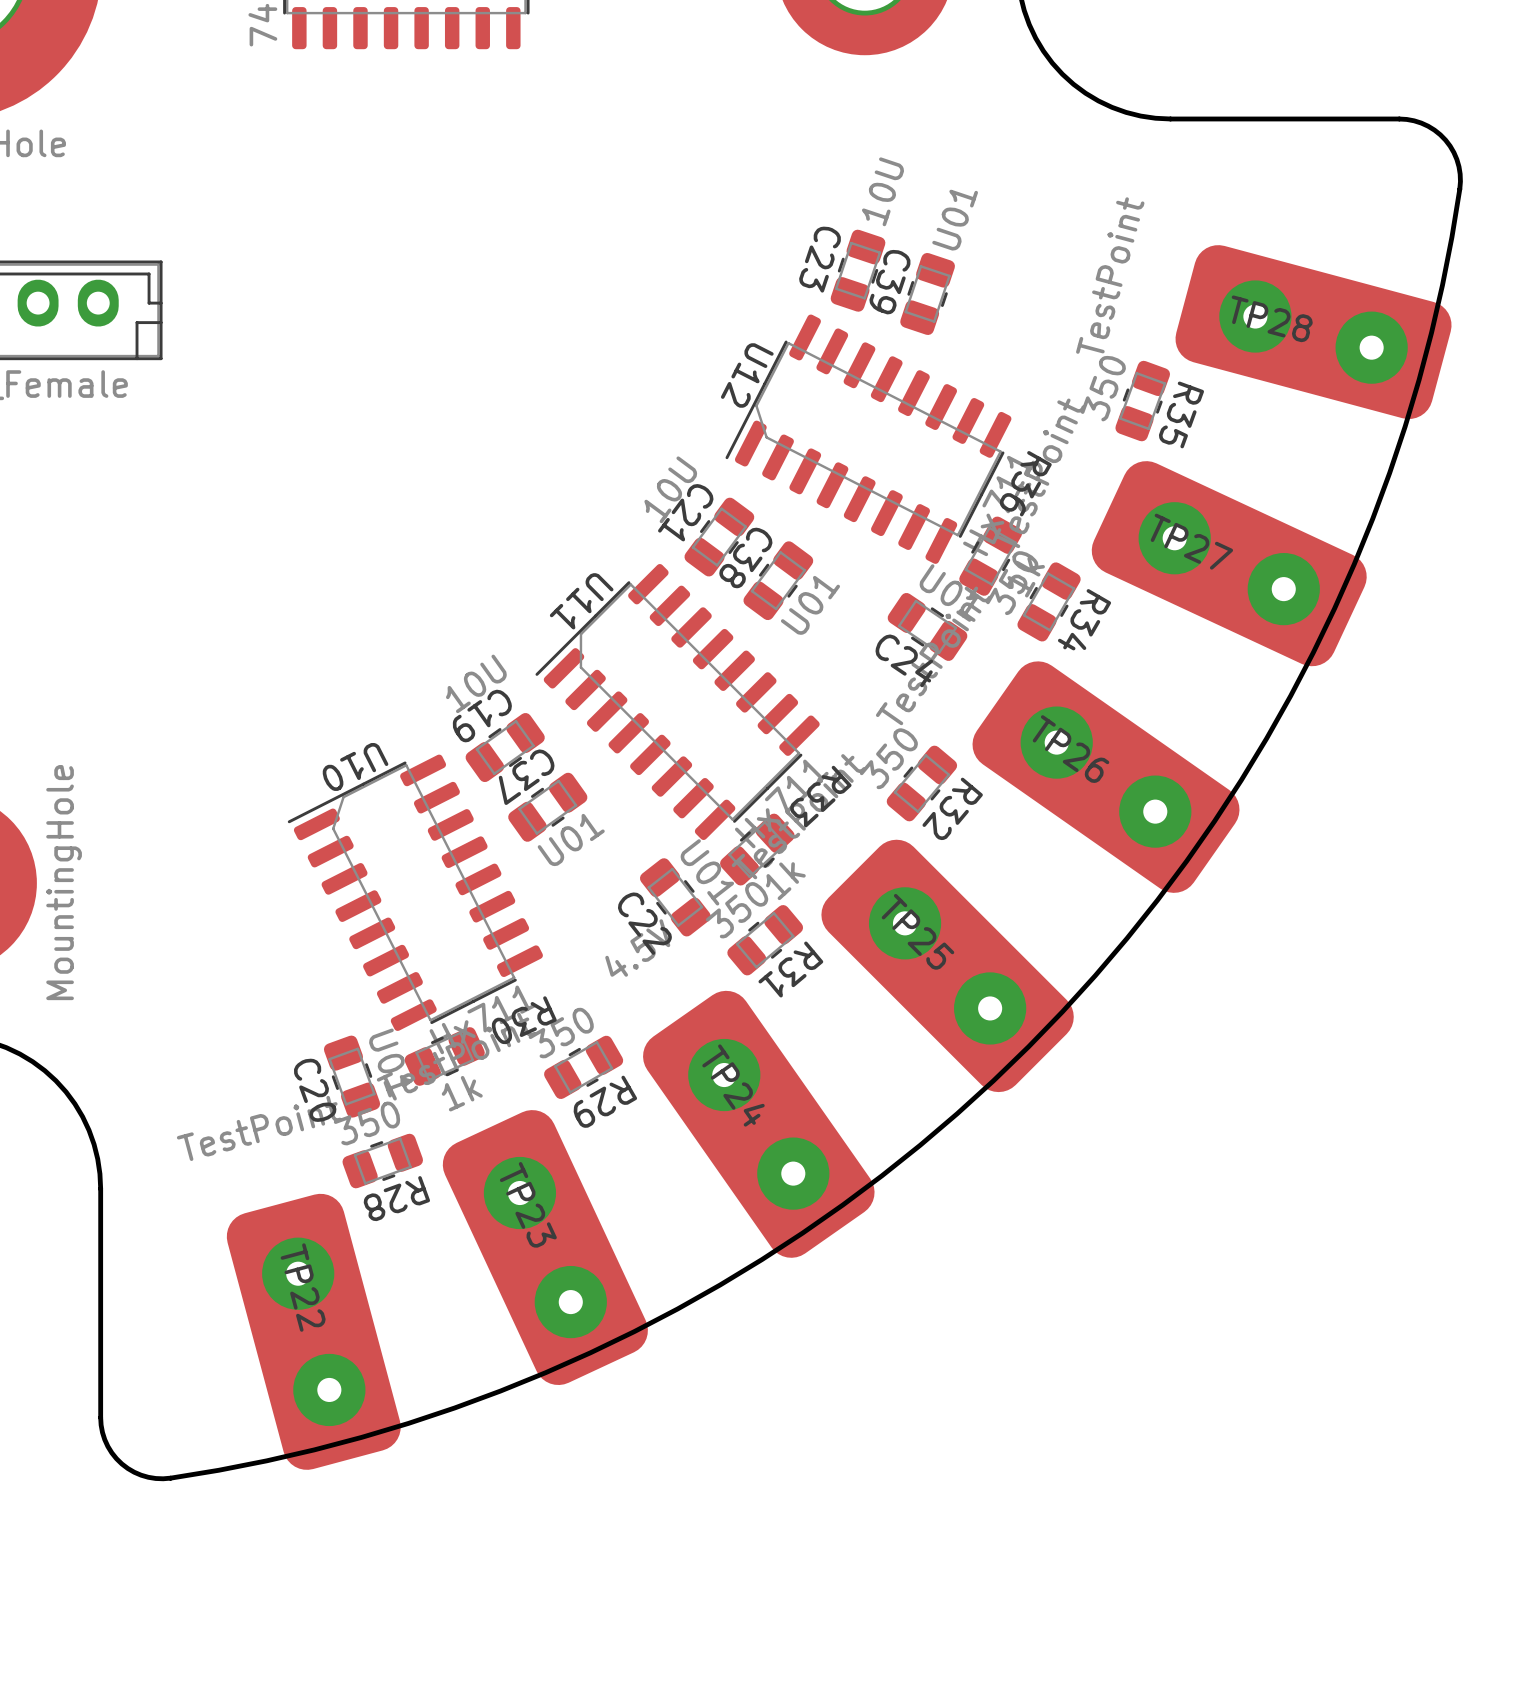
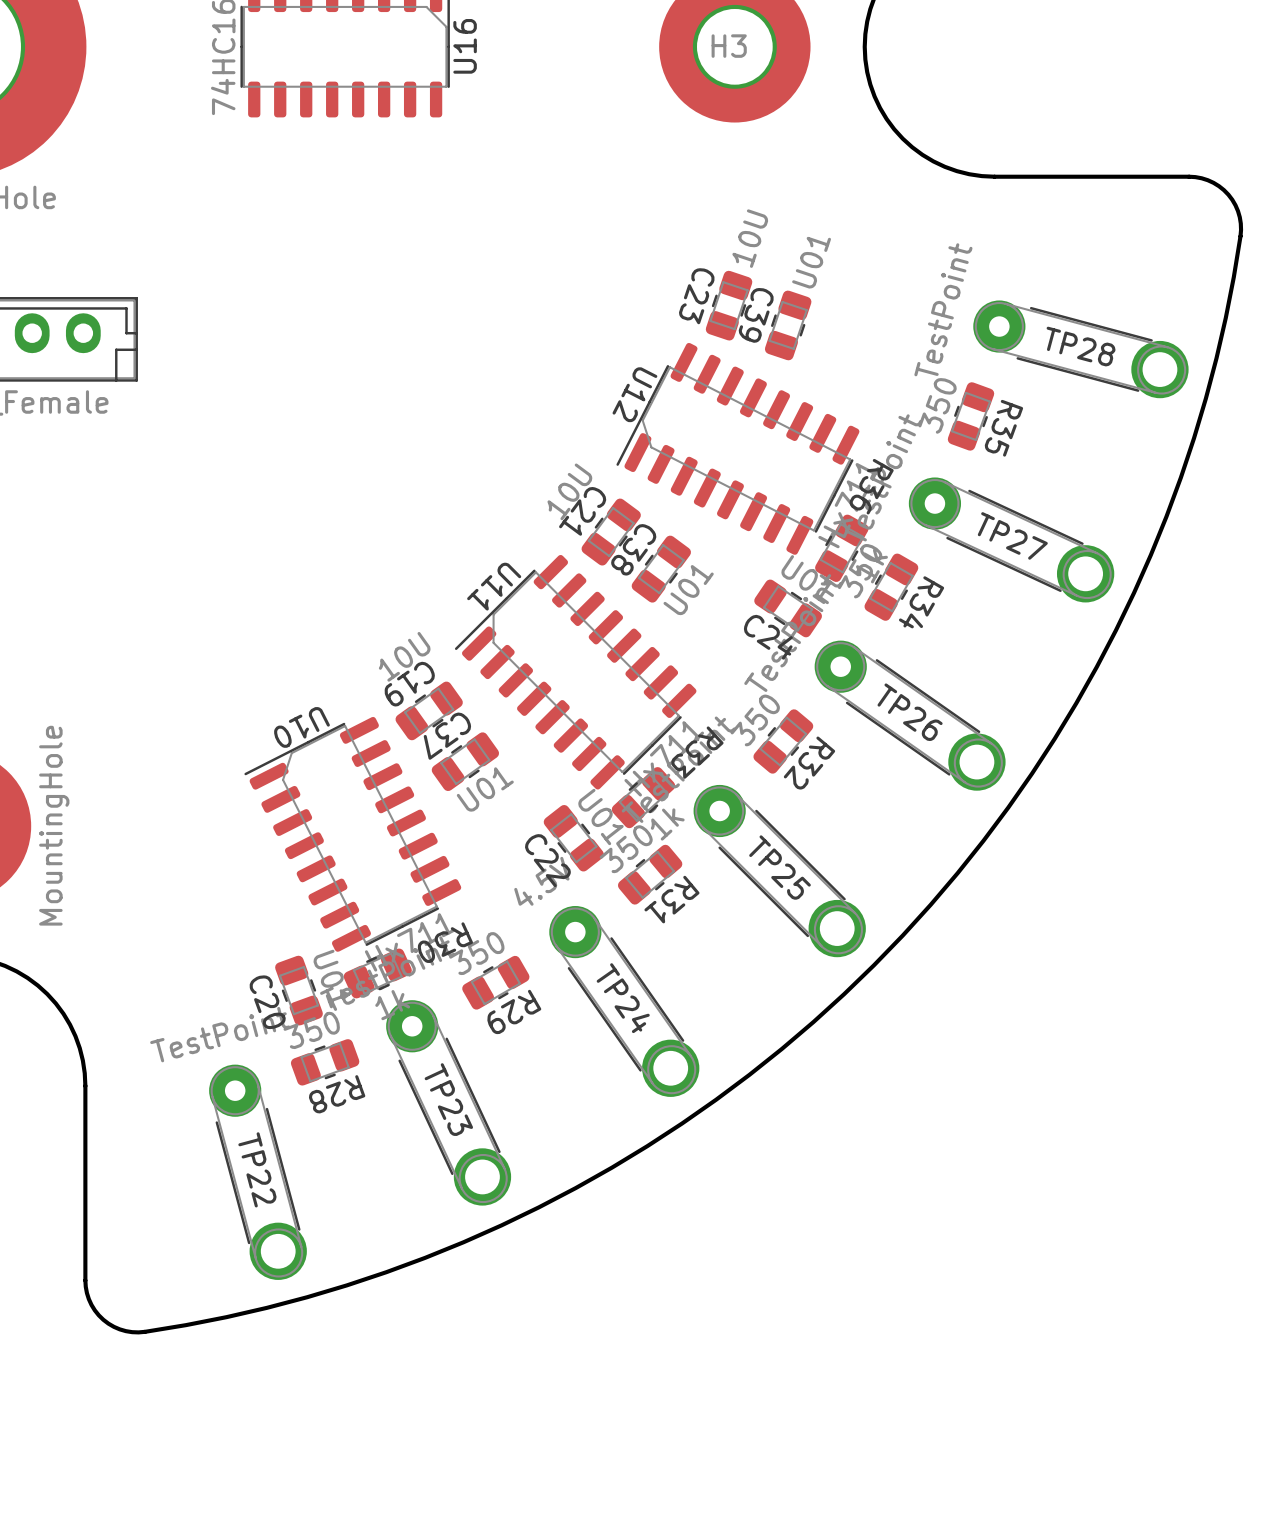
TP28 footprint: [1175, 245, 1452, 420] -> [973, 300, 1189, 399]
TP27 footprint: [1091, 461, 1367, 667] -> [908, 477, 1115, 603]
TP26 footprint: [972, 661, 1240, 893] -> [814, 640, 1006, 791]
TP25 footprint: [821, 839, 1074, 1093] -> [693, 784, 866, 958]
TP24 footprint: [643, 990, 875, 1258] -> [549, 906, 700, 1097]
TP23 footprint: [442, 1110, 648, 1386] -> [386, 1000, 512, 1206]
TP22 footprint: [226, 1193, 401, 1470] -> [209, 1064, 307, 1280]

